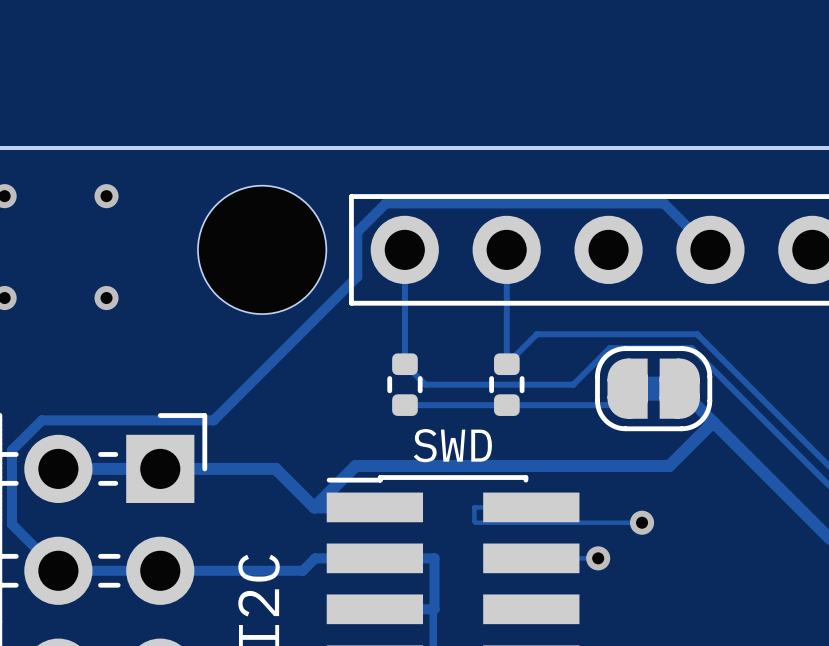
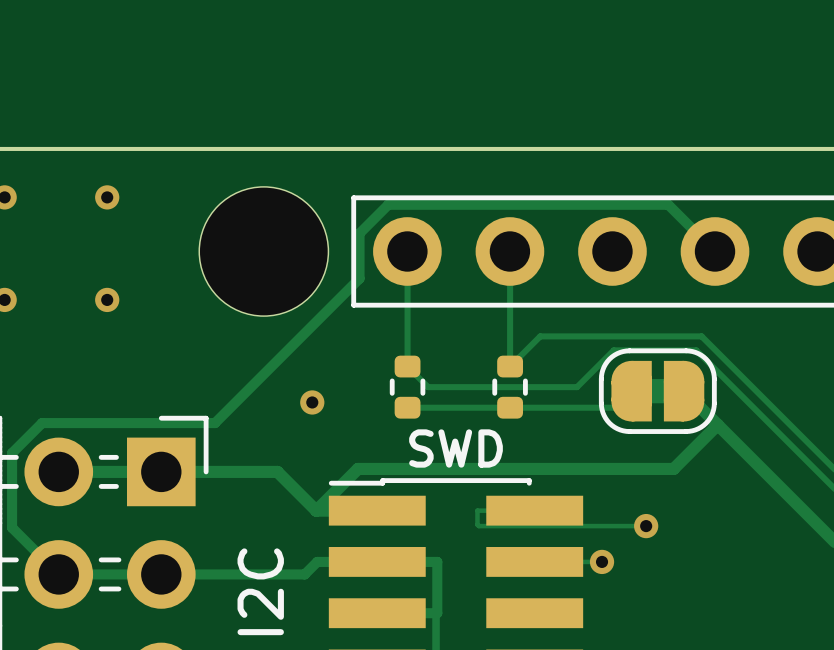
via: none -> (312, 402)

